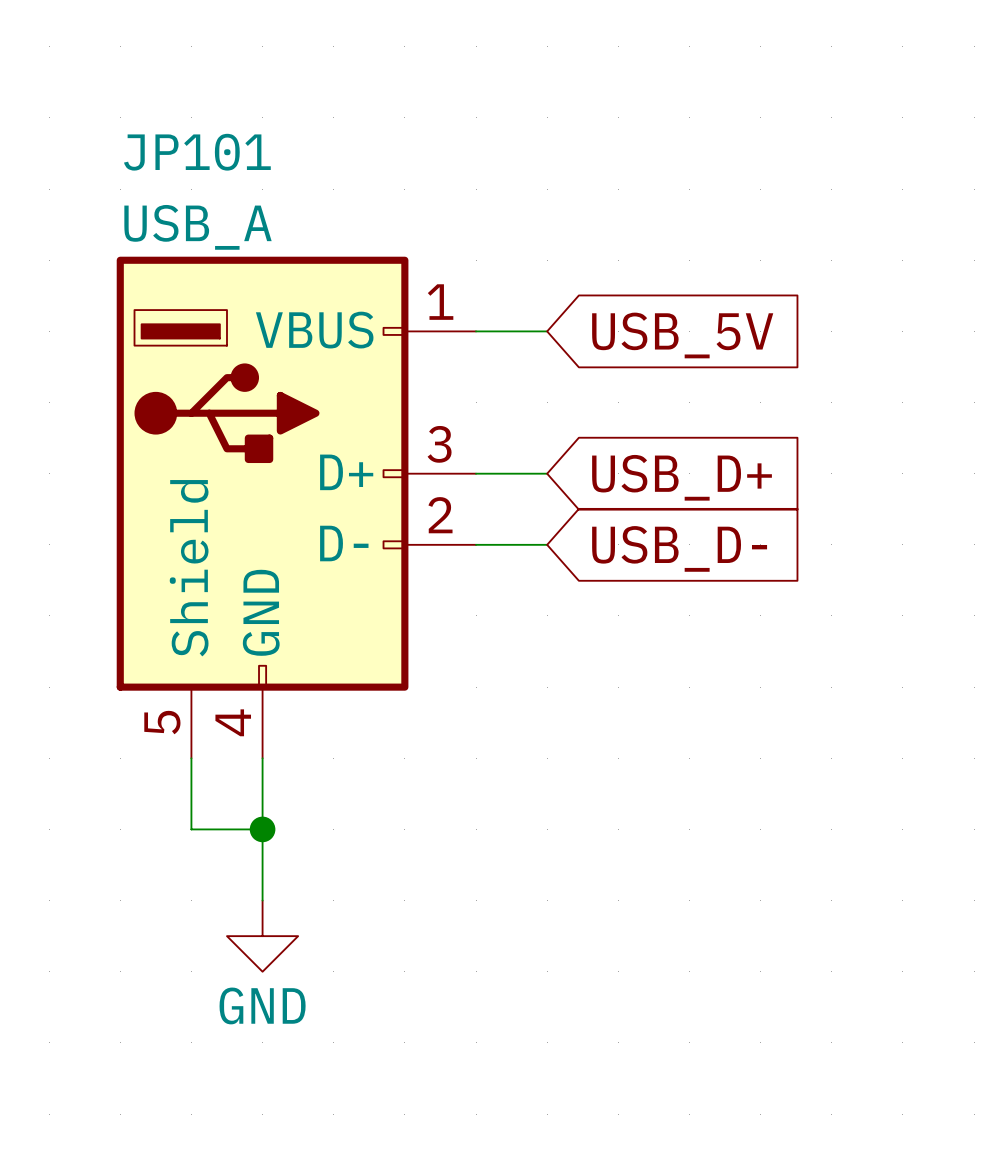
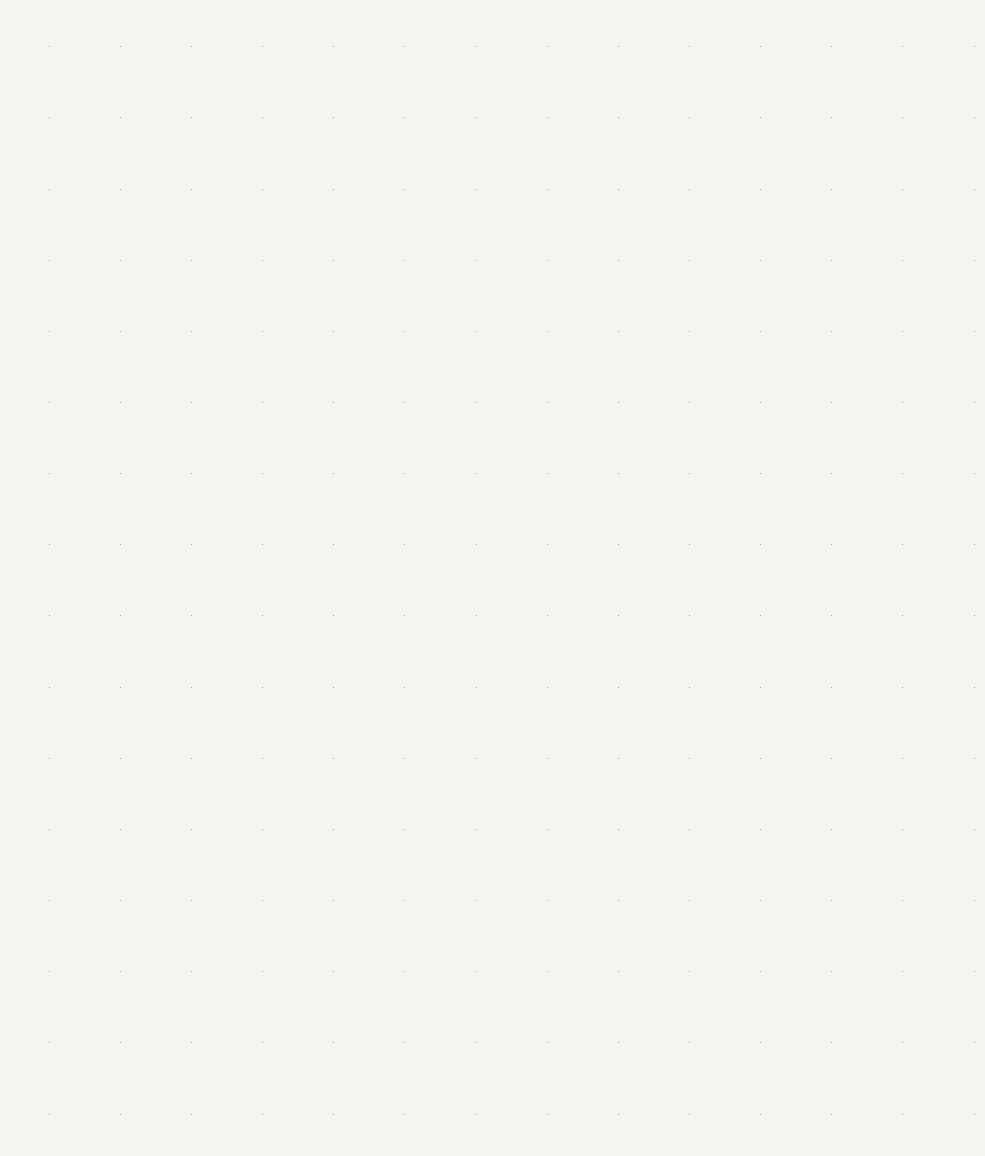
wire: (476, 331) (547, 331) -> none
global label: USB_5V (682, 335) -> none
wire: (476, 473) (547, 473) -> none
global label: USB_D+ (682, 477) -> none
JP101: USB_A (296, 507) -> none
wire: (476, 544) (547, 544) -> none
global label: USB_D- (679, 548) -> none
wire: (191, 758) (191, 829) (262, 829) -> none
wire: (262, 758) (262, 900) -> none
junction: (262, 829) -> none
power symbol: GND (262, 936) -> none

